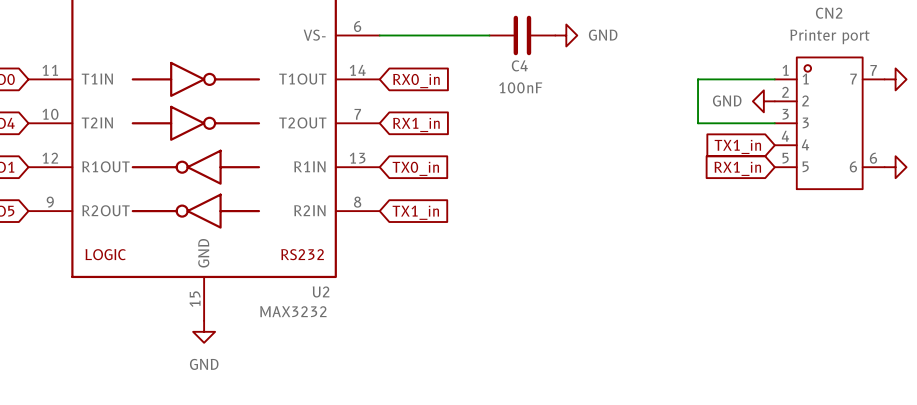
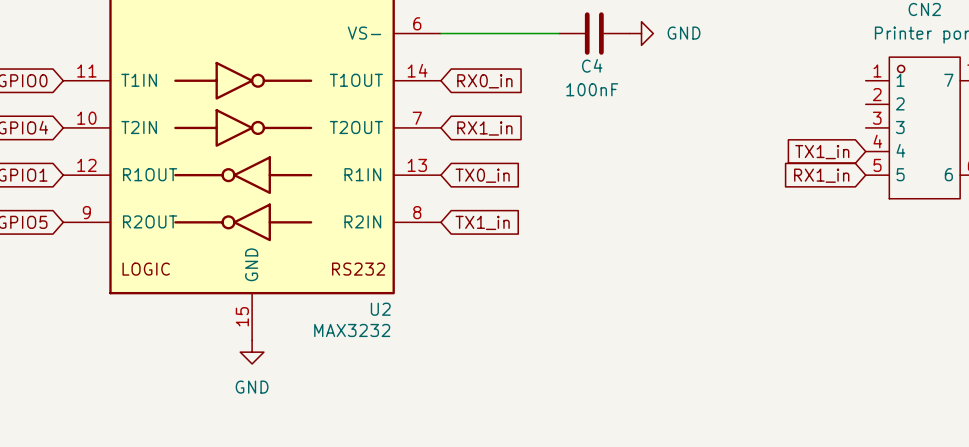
wire: (774, 79) (698, 79) (698, 123) (774, 123) -> none
power symbol: GND (763, 101) -> none

